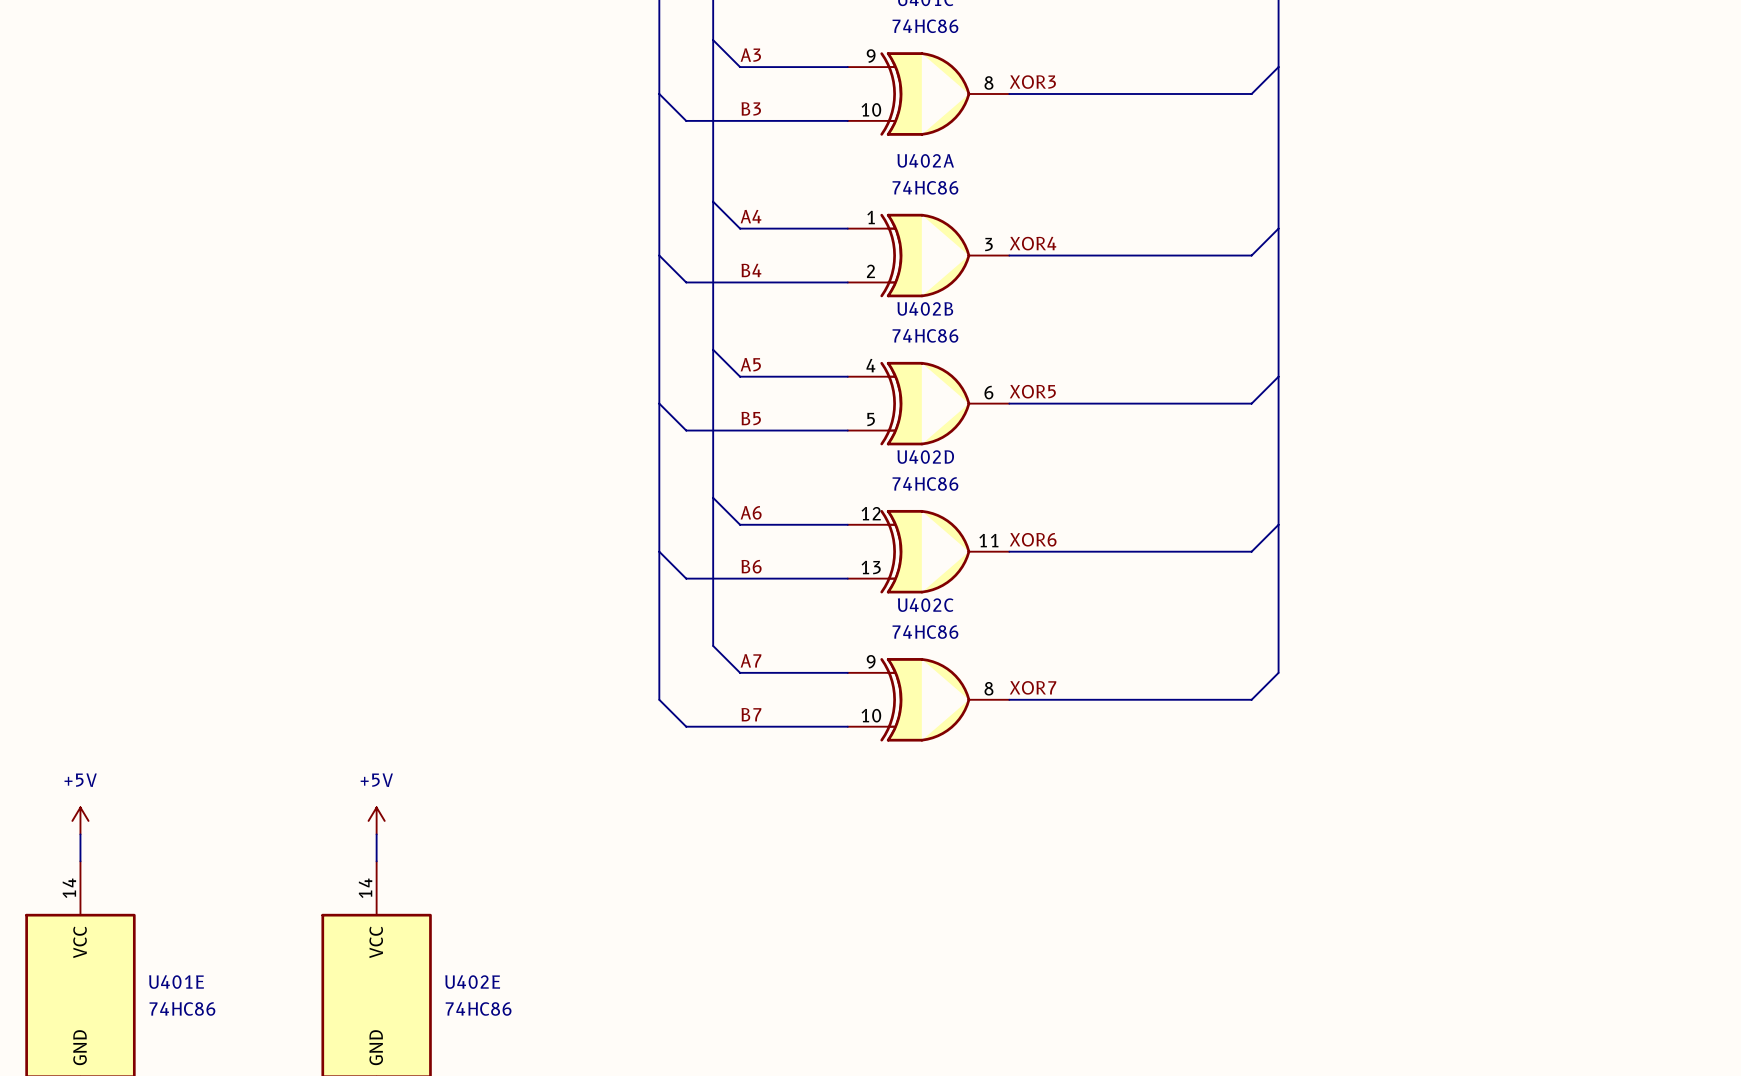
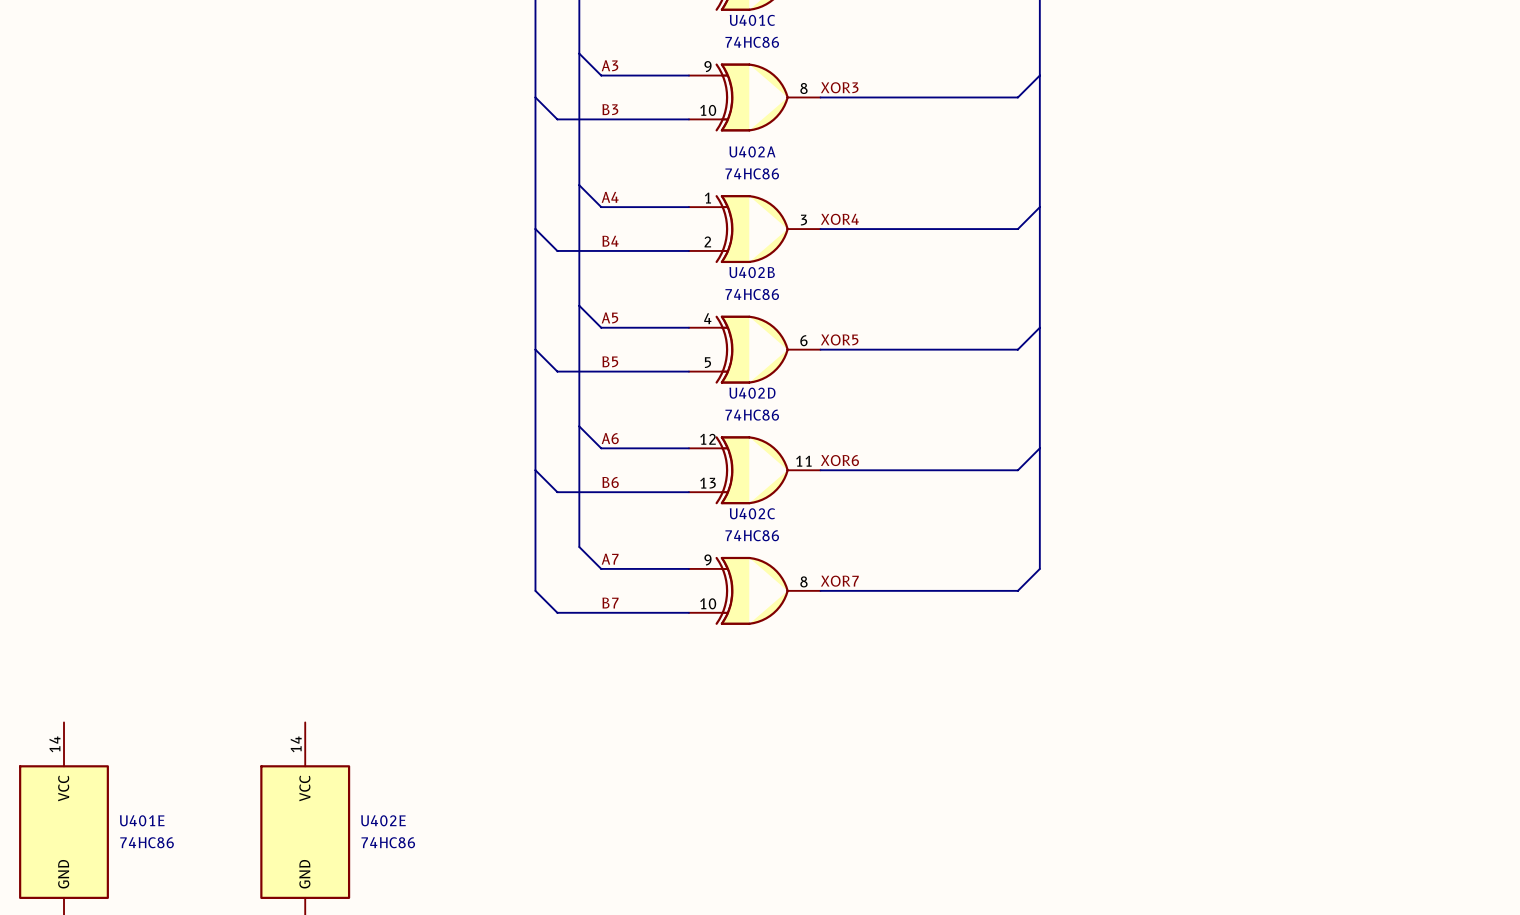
power symbol: +5V (80, 820) -> none
power symbol: +5V (376, 820) -> none
wire: (80, 834) (80, 861) -> none
wire: (376, 834) (376, 861) -> none

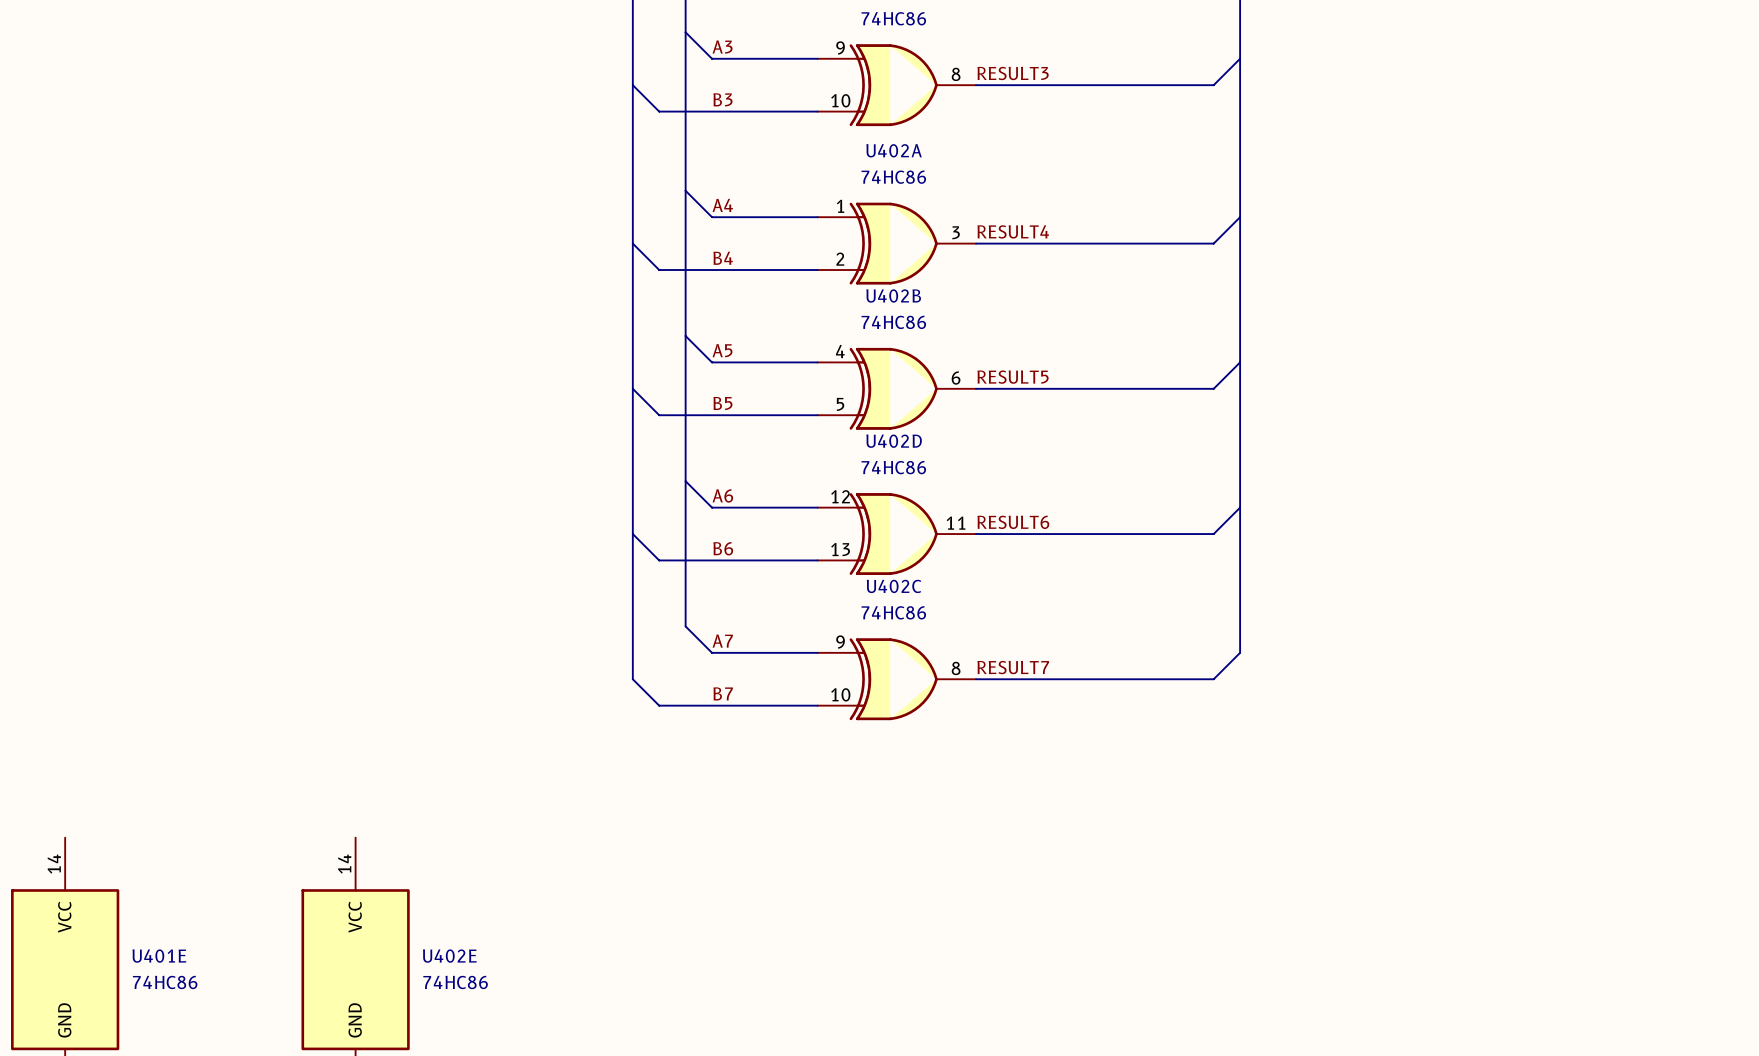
label: XOR3 (839, 87) -> RESULT3 (1013, 73)
label: XOR4 (839, 219) -> RESULT4 (1013, 231)
label: XOR5 (839, 339) -> RESULT5 (1013, 377)
label: XOR6 (839, 460) -> RESULT6 (1013, 522)
label: XOR7 (839, 581) -> RESULT7 (1013, 667)

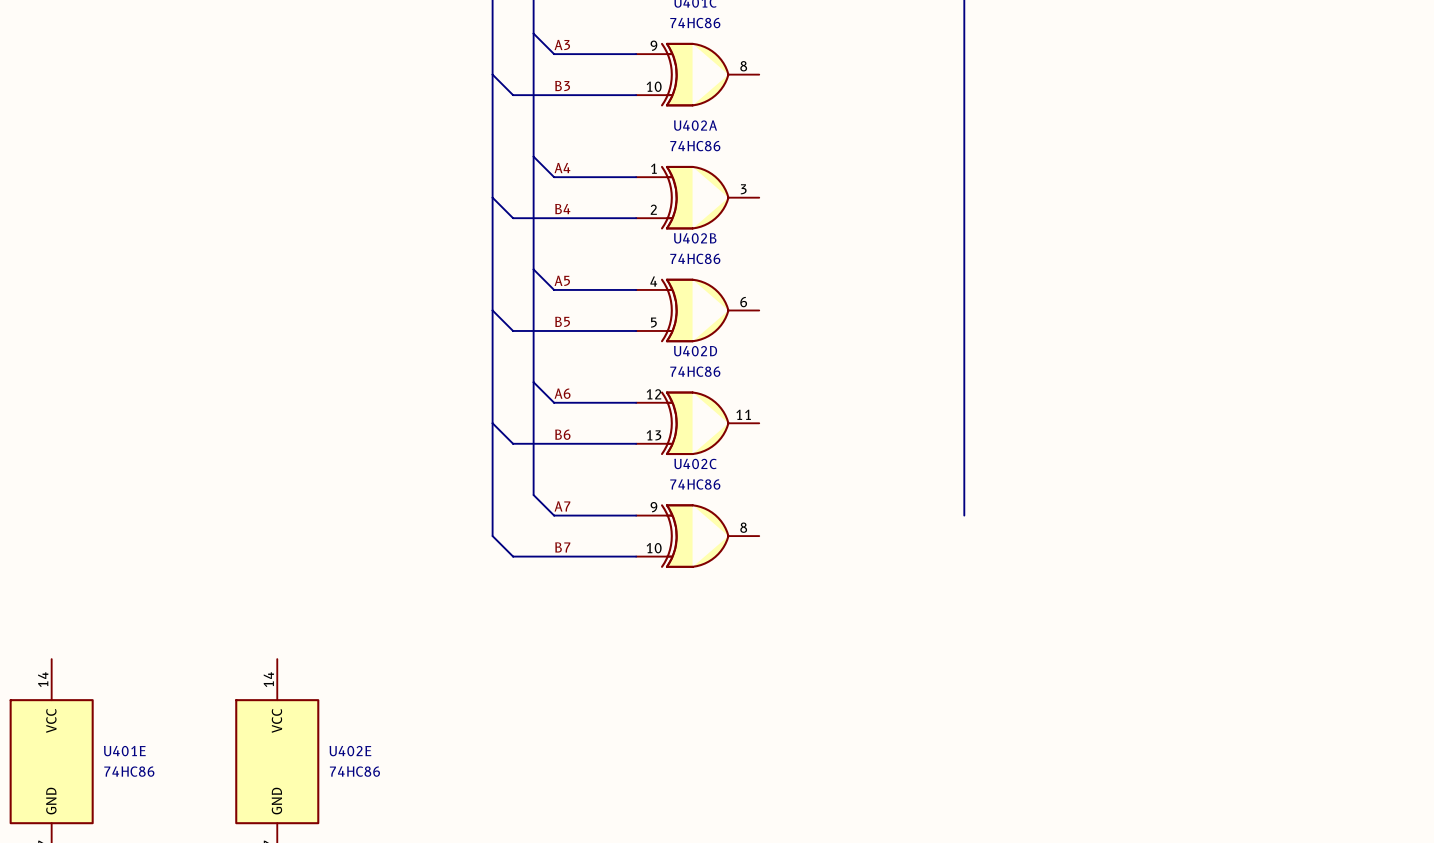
wire: (1240, 58) (1213, 85) (976, 85) -> none
label: RESULT3 (1013, 73) -> none
wire: (1240, 217) (1213, 243) (976, 243) -> none
label: RESULT4 (1013, 231) -> none
wire: (1240, 362) (1213, 388) (976, 388) -> none
label: RESULT5 (1013, 377) -> none
wire: (1240, 507) (1213, 534) (976, 534) -> none
label: RESULT6 (1013, 522) -> none
wire: (1240, 652) (1213, 679) (976, 679) -> none
label: RESULT7 (1013, 667) -> none

